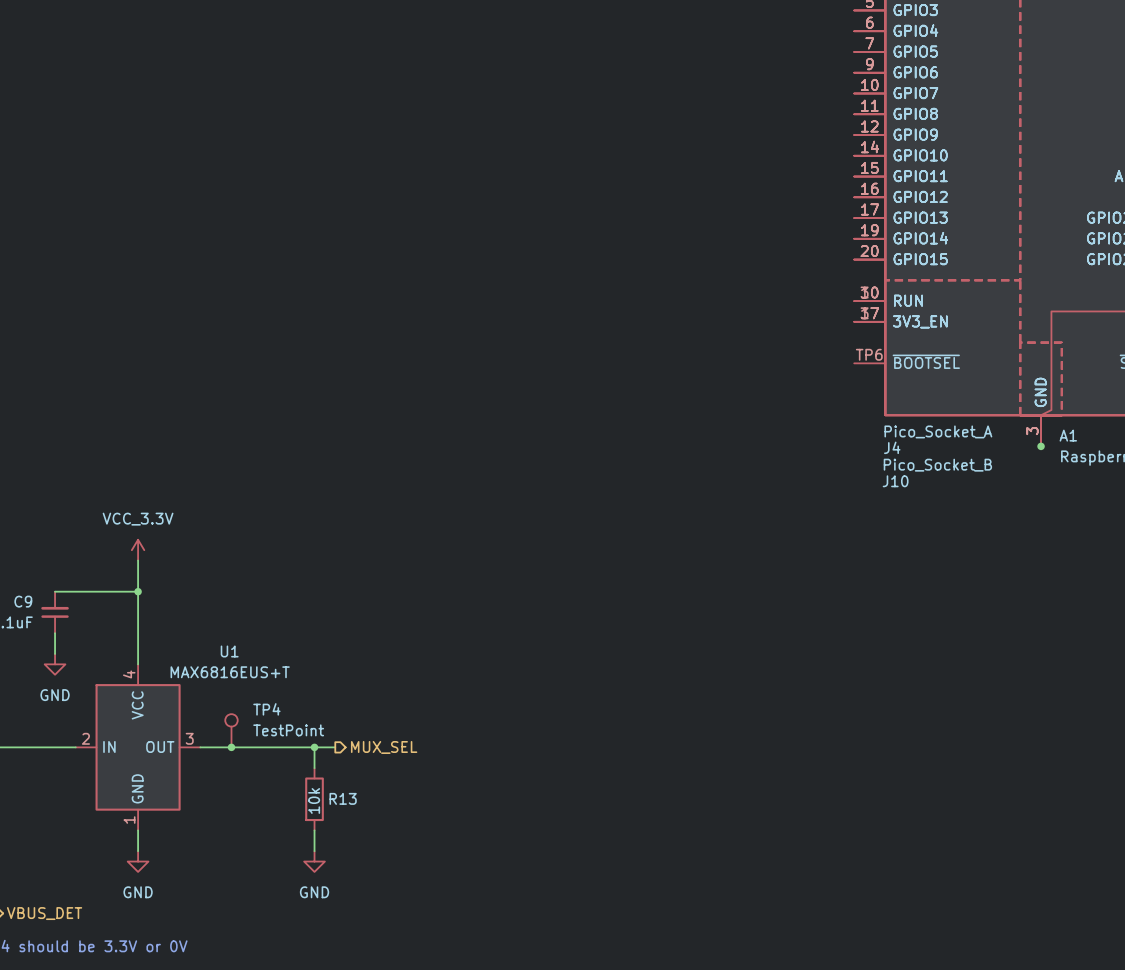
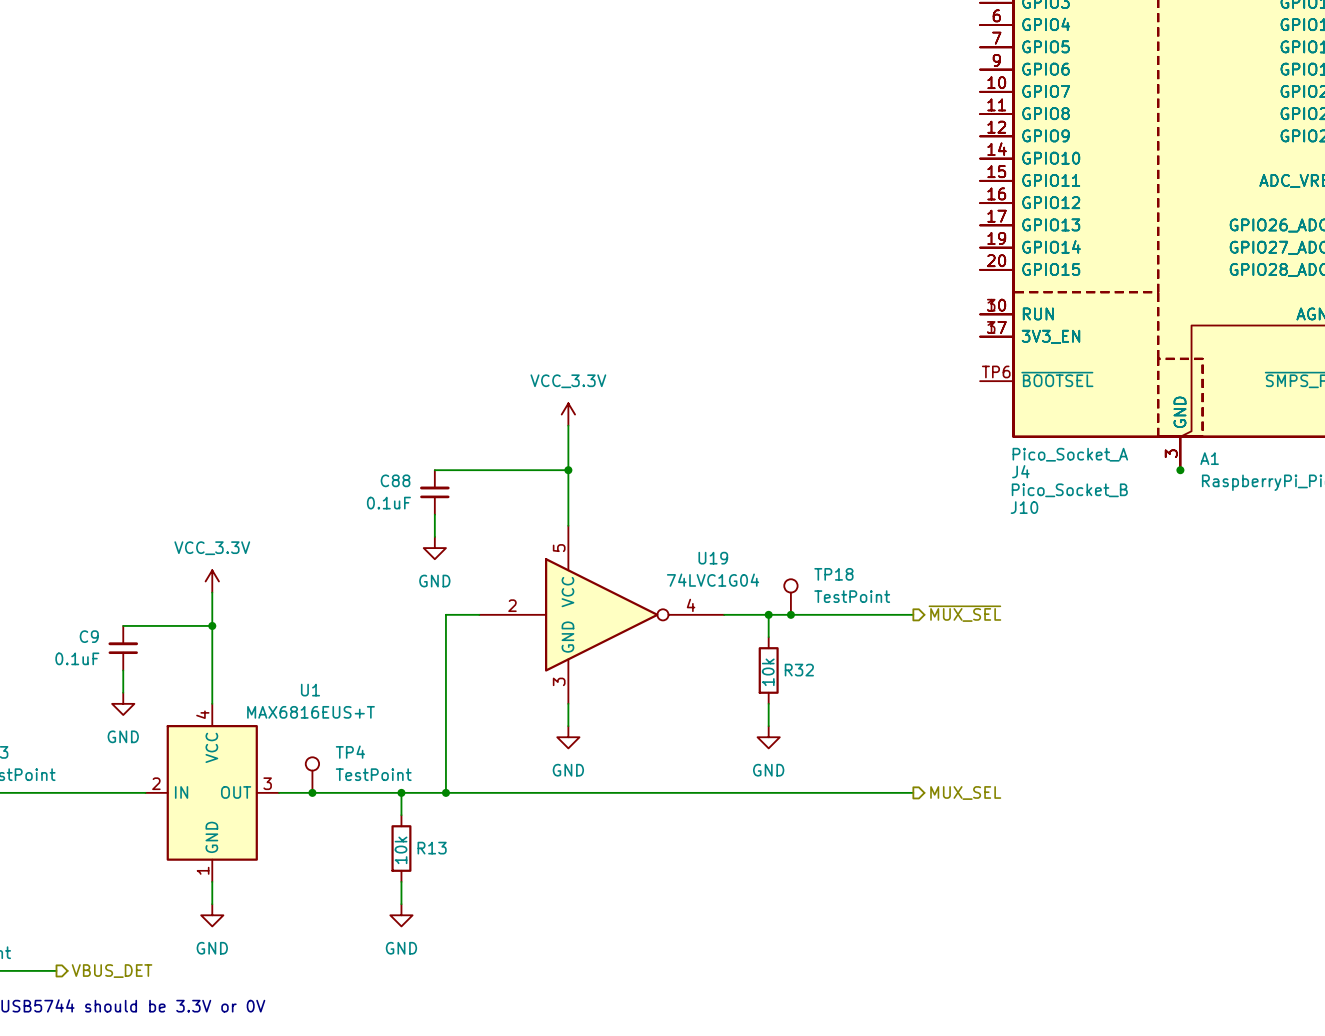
power symbol: none -> VCC_3.3V (568, 414)
wire: none -> (568, 425) (568, 525)
wire: none -> (434, 470) (568, 470)
junction: none -> (568, 470)
C88: none -> 0.1uF (434, 492)
wire: none -> (434, 514) (434, 536)
power symbol: none -> GND (434, 548)
TP18: none -> TestPoint (790, 597)
hierarchical label: none -> ~{MUX_SEL} (964, 613)
wire: none -> (479, 614) (445, 614) (445, 792)
U19: none -> 74LVC1G04 (601, 614)
wire: none -> (724, 614) (913, 614)
wire: none -> (768, 614) (768, 637)
junction: none -> (768, 614)
junction: none -> (790, 614)
R32: none -> 10k (768, 670)
wire: none -> (568, 703) (568, 726)
wire: none -> (768, 703) (768, 726)
power symbol: none -> GND (568, 737)
power symbol: none -> GND (768, 737)
wire: none -> (423, 792) (913, 792)
junction: none -> (445, 792)
hierarchical label: MUX_SEL (384, 747) -> none
hierarchical label: none -> MUX_SEL (965, 793)

